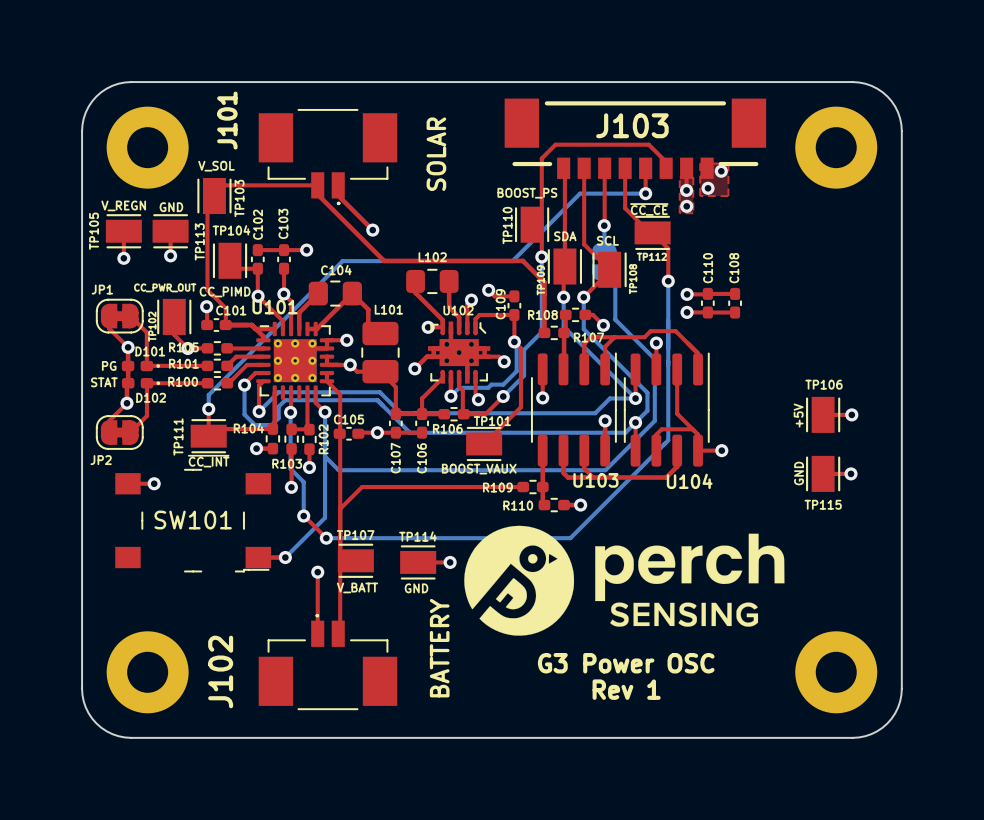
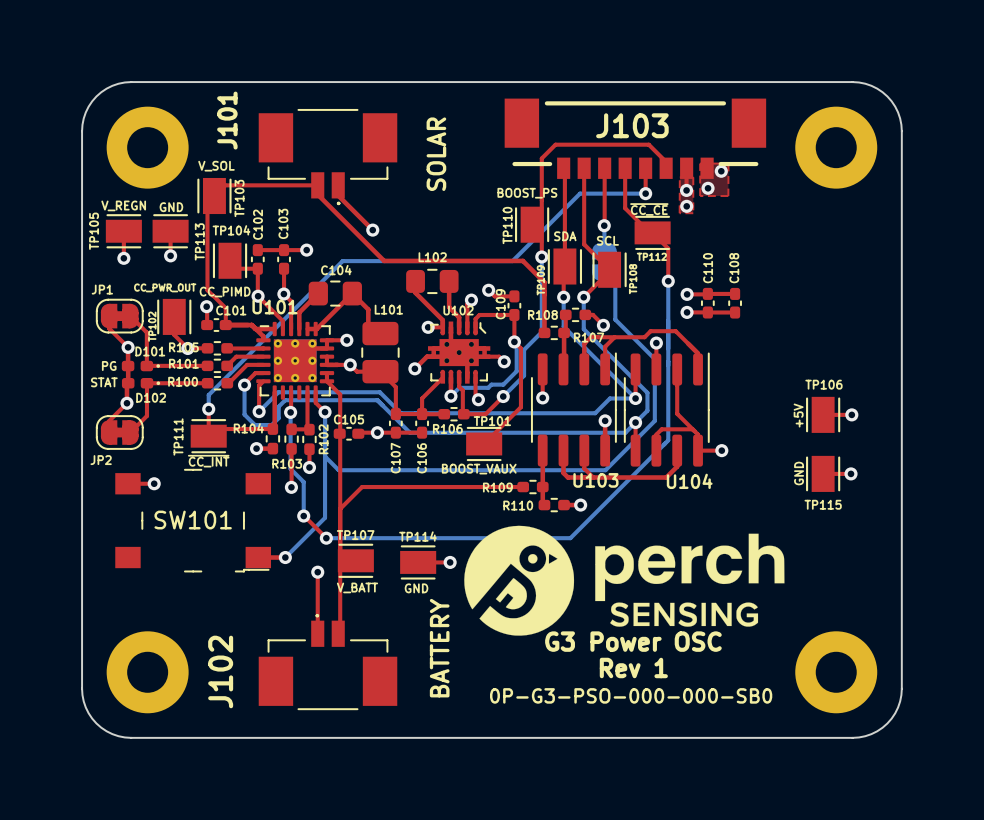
text: none -> G3 Power OSC (633, 641)
text: G3 Power OSC (626, 663) -> Rev 1 (633, 667)
text: Rev 1 (626, 689) -> 0P-G3-PSO-000-000-SB0 (631, 695)

